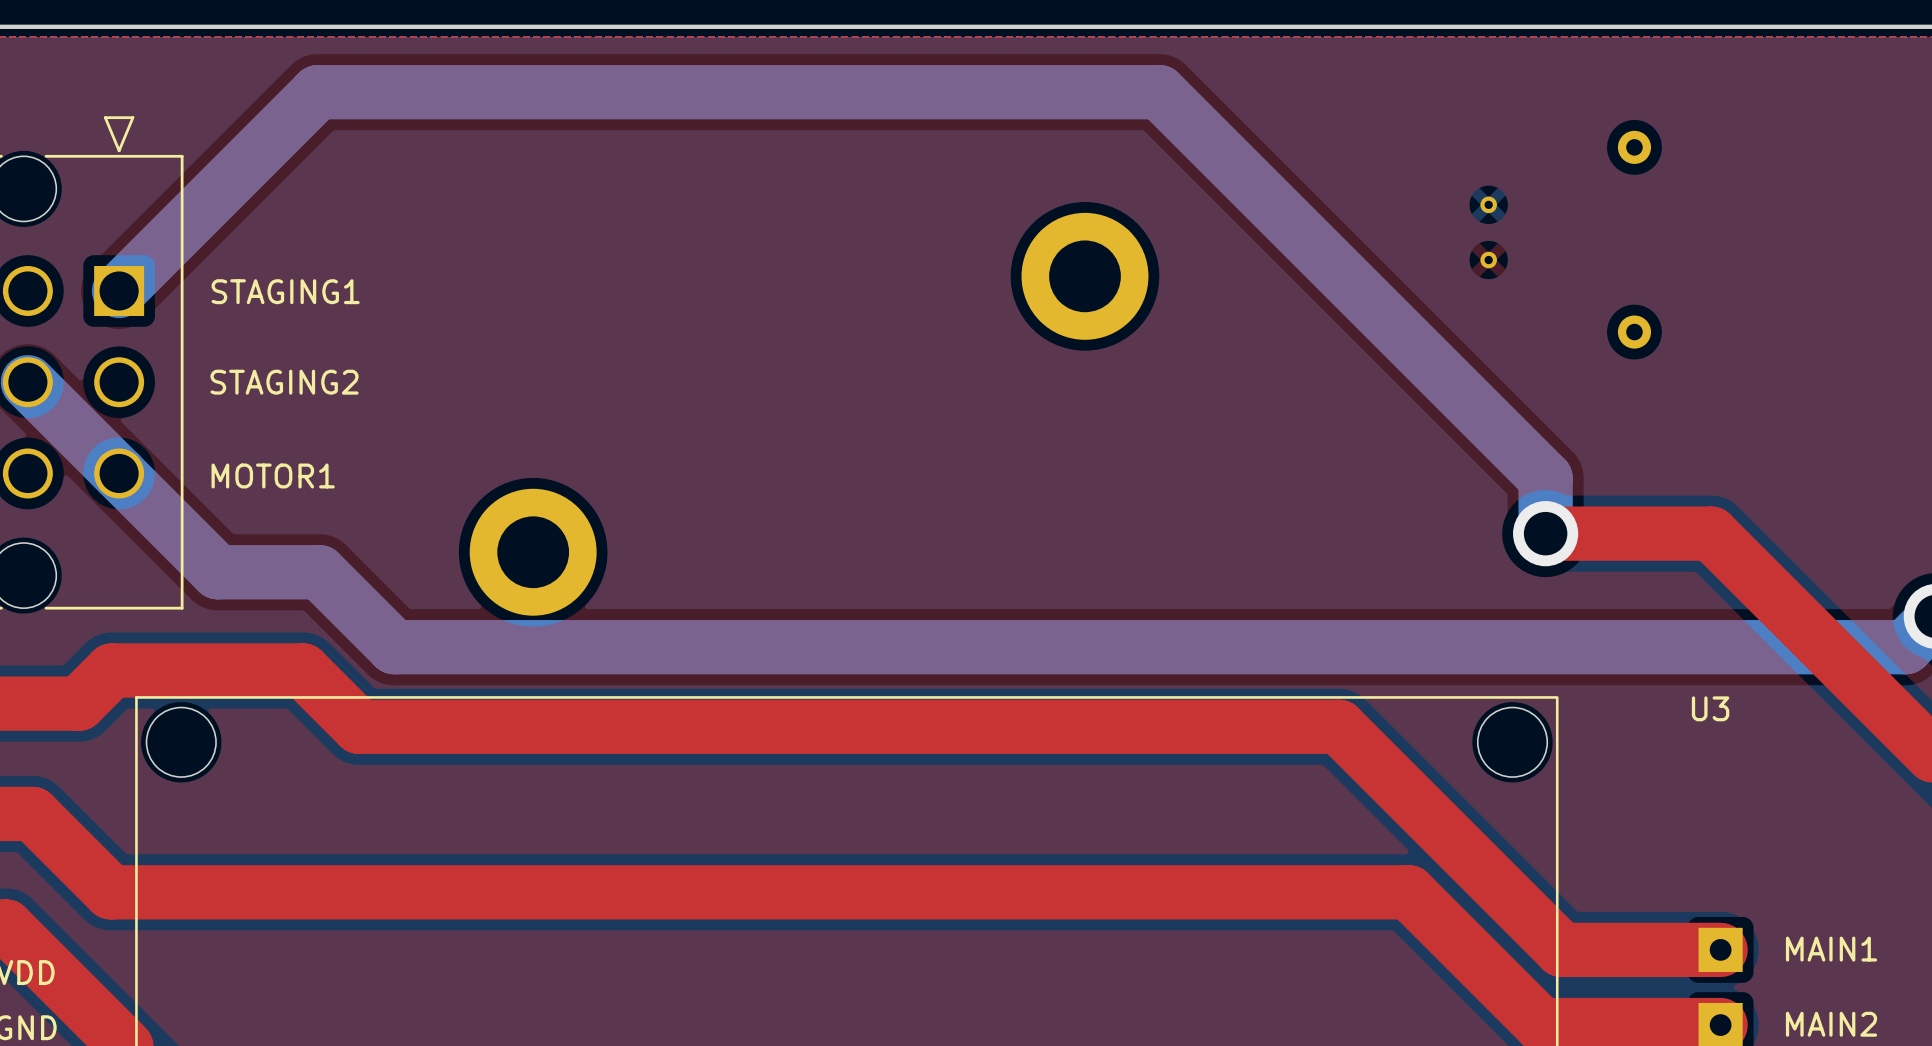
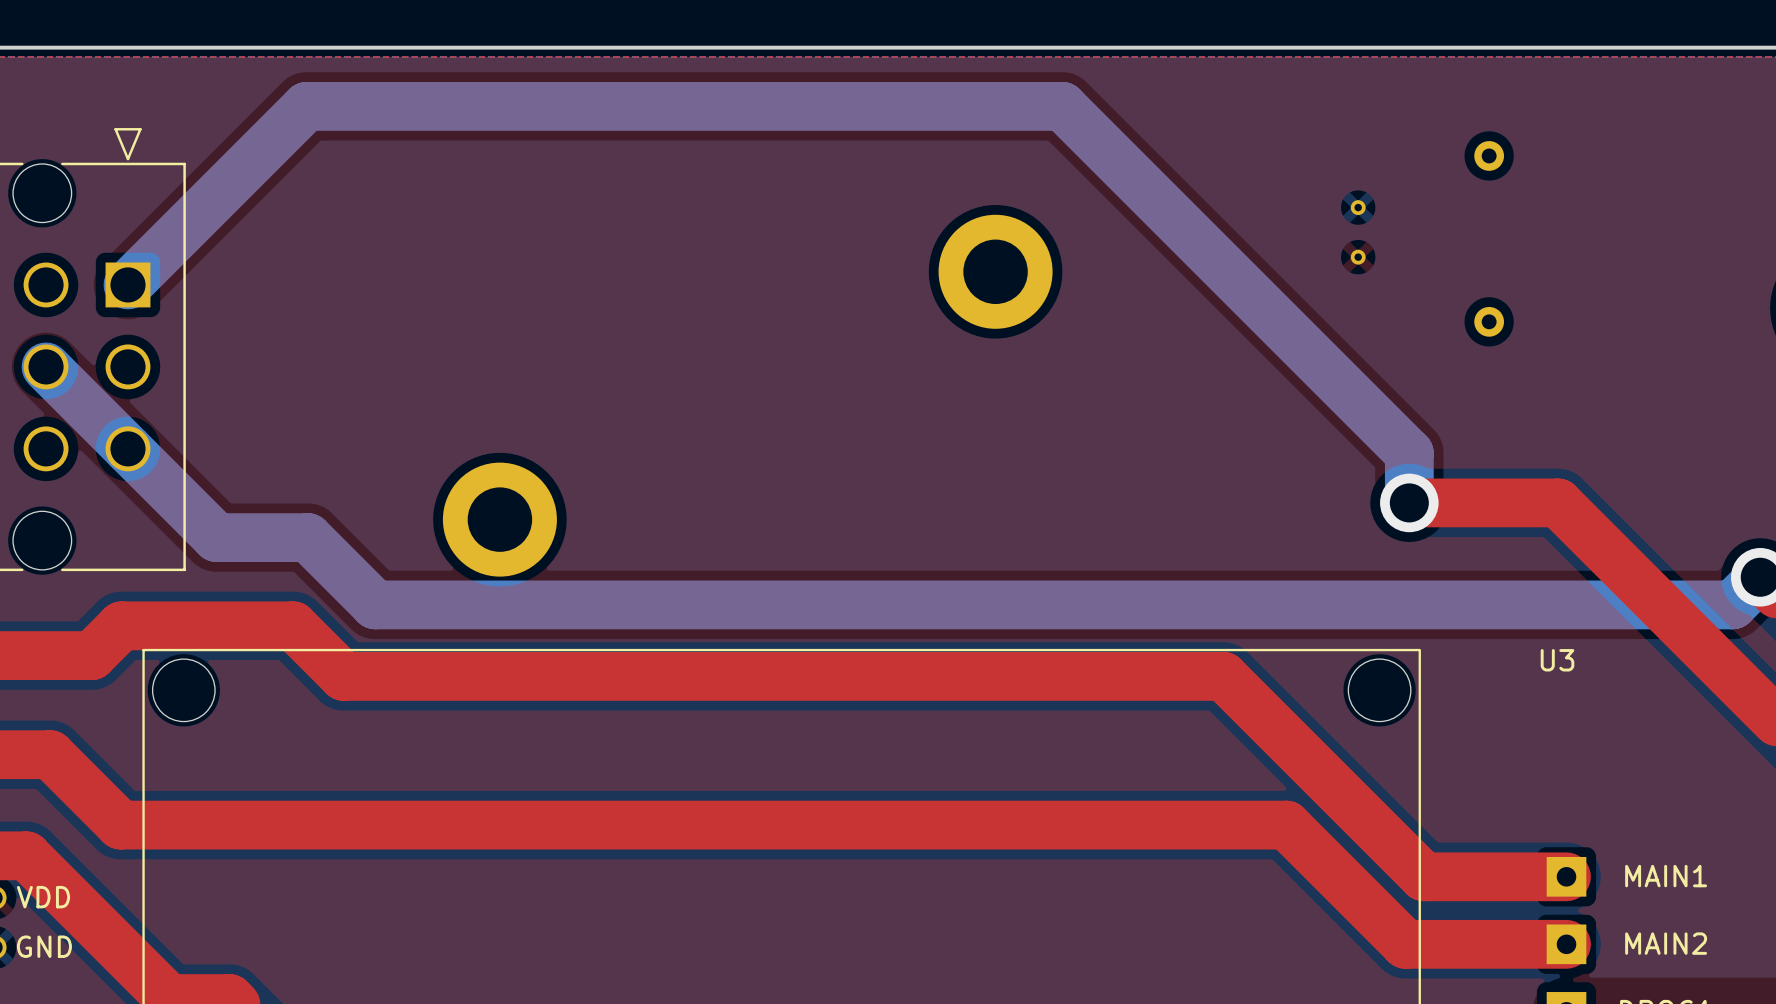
text: STAGING1 (285, 291) -> none
text: STAGING2 (284, 382) -> none
text: MOTOR1 (273, 475) -> none

